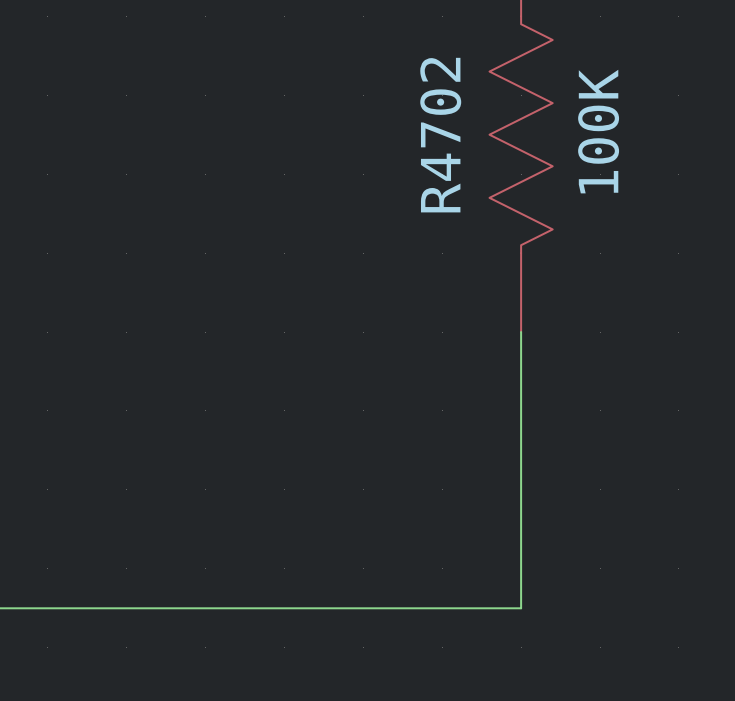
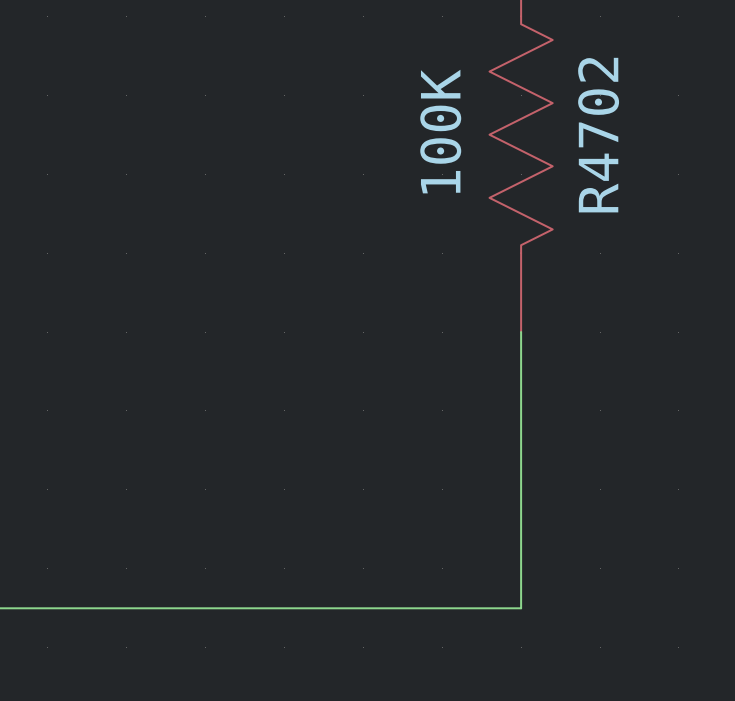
100K name: 100K (598, 131) -> R4702 (598, 135)
100K value: R4702 (440, 135) -> 100K (440, 131)

